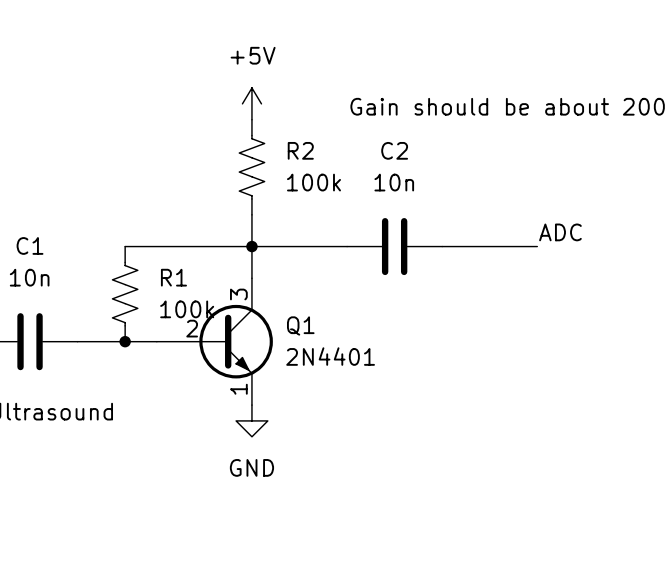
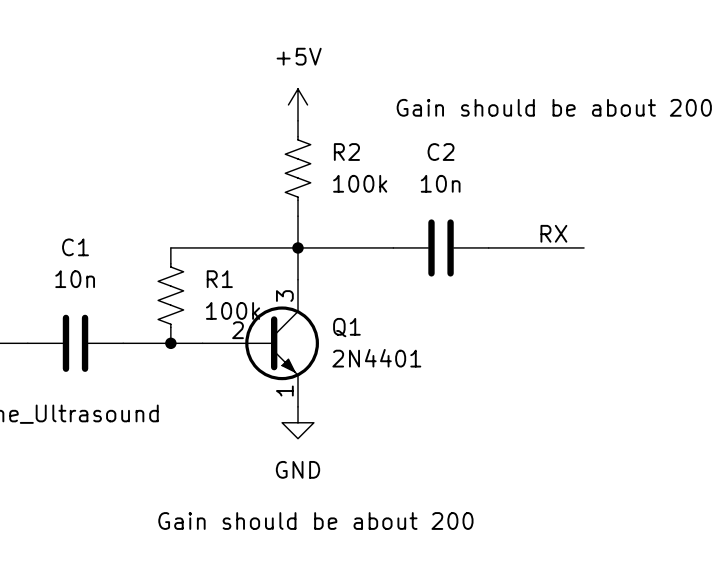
label: none -> RX (553, 233)
label: ADC (560, 232) -> none
text: none -> Gain should be about 200 (315, 521)

